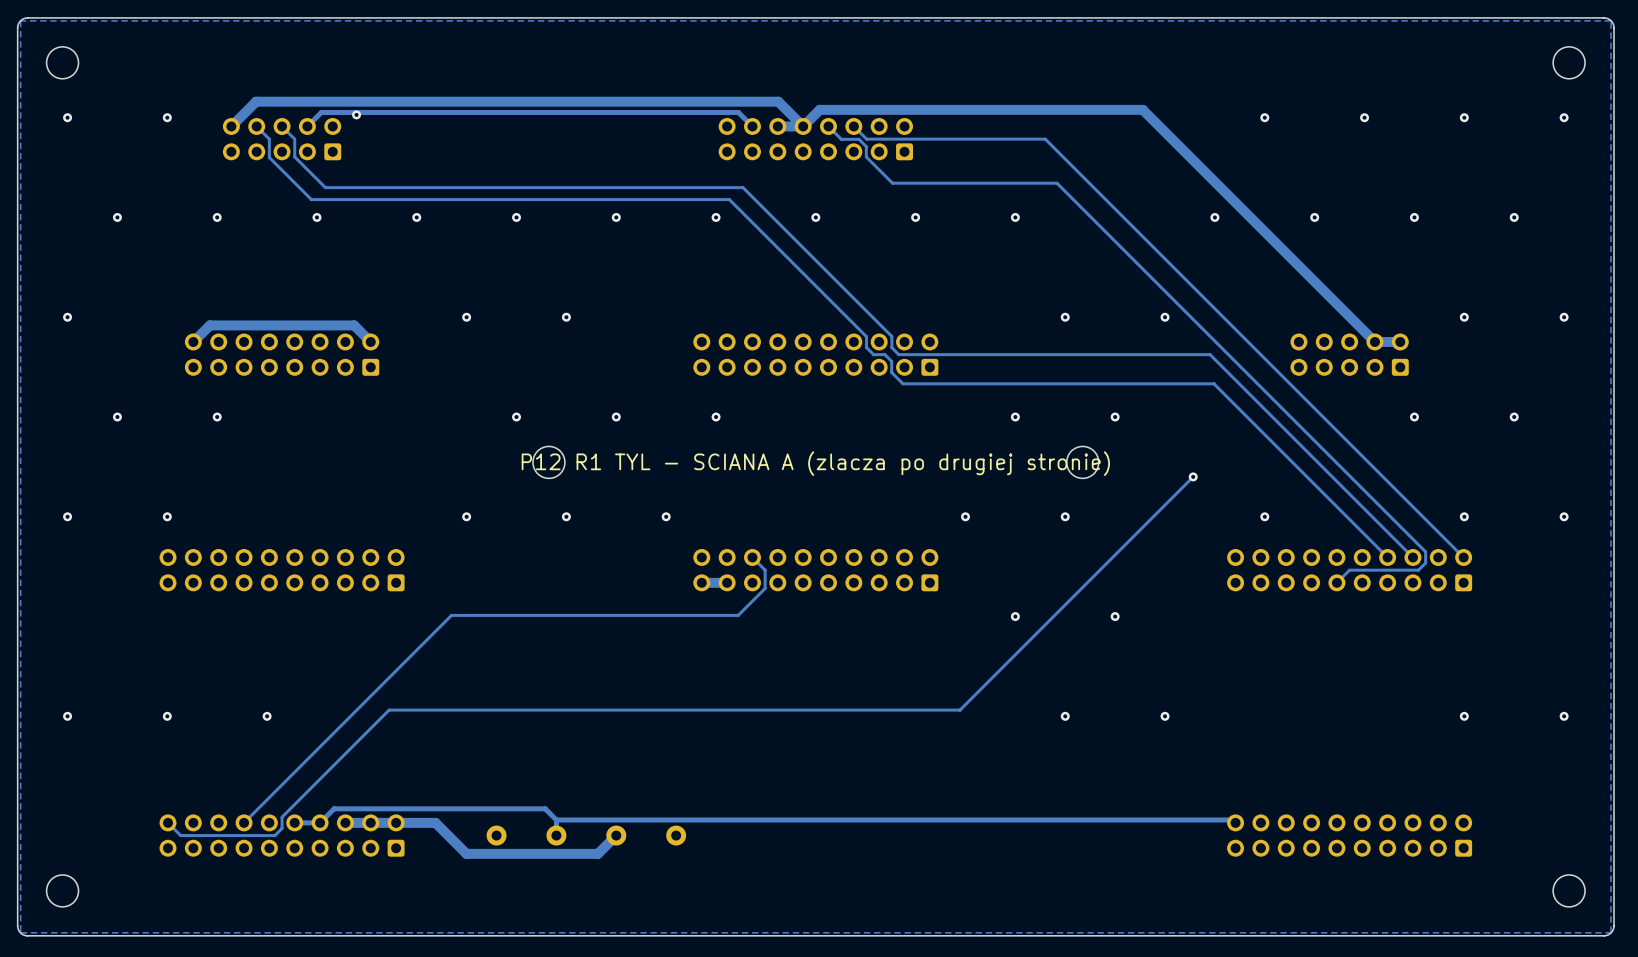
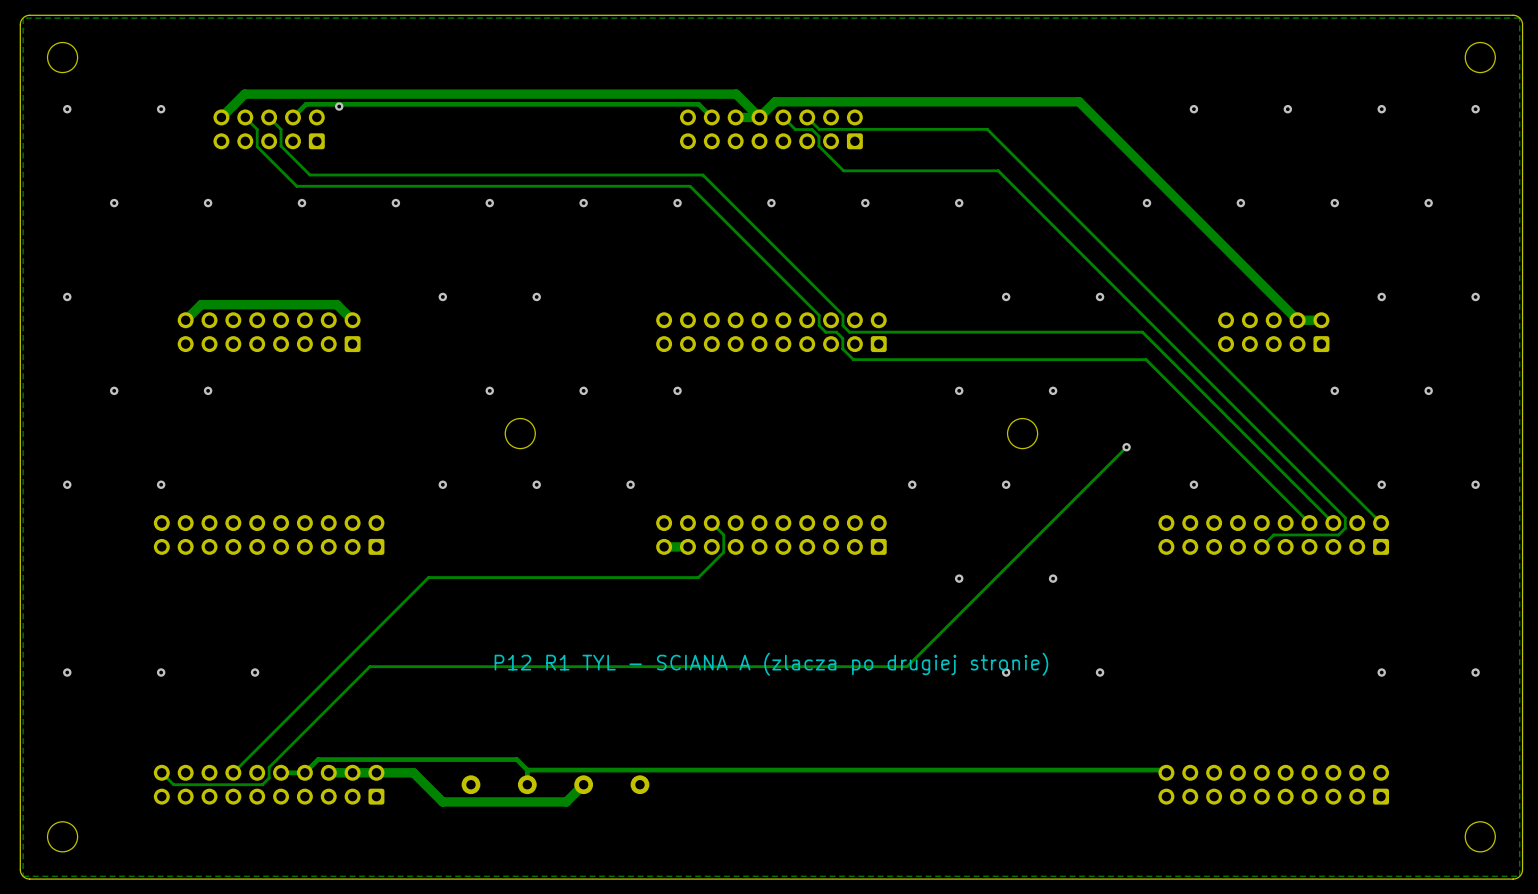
text position: P12 R1 TYL - SCIANA A (zlacza po drugiej stronie) (815, 463) -> P12 R1 TYL - SCIANA A (zlacza po drugiej stronie) (771, 664)

